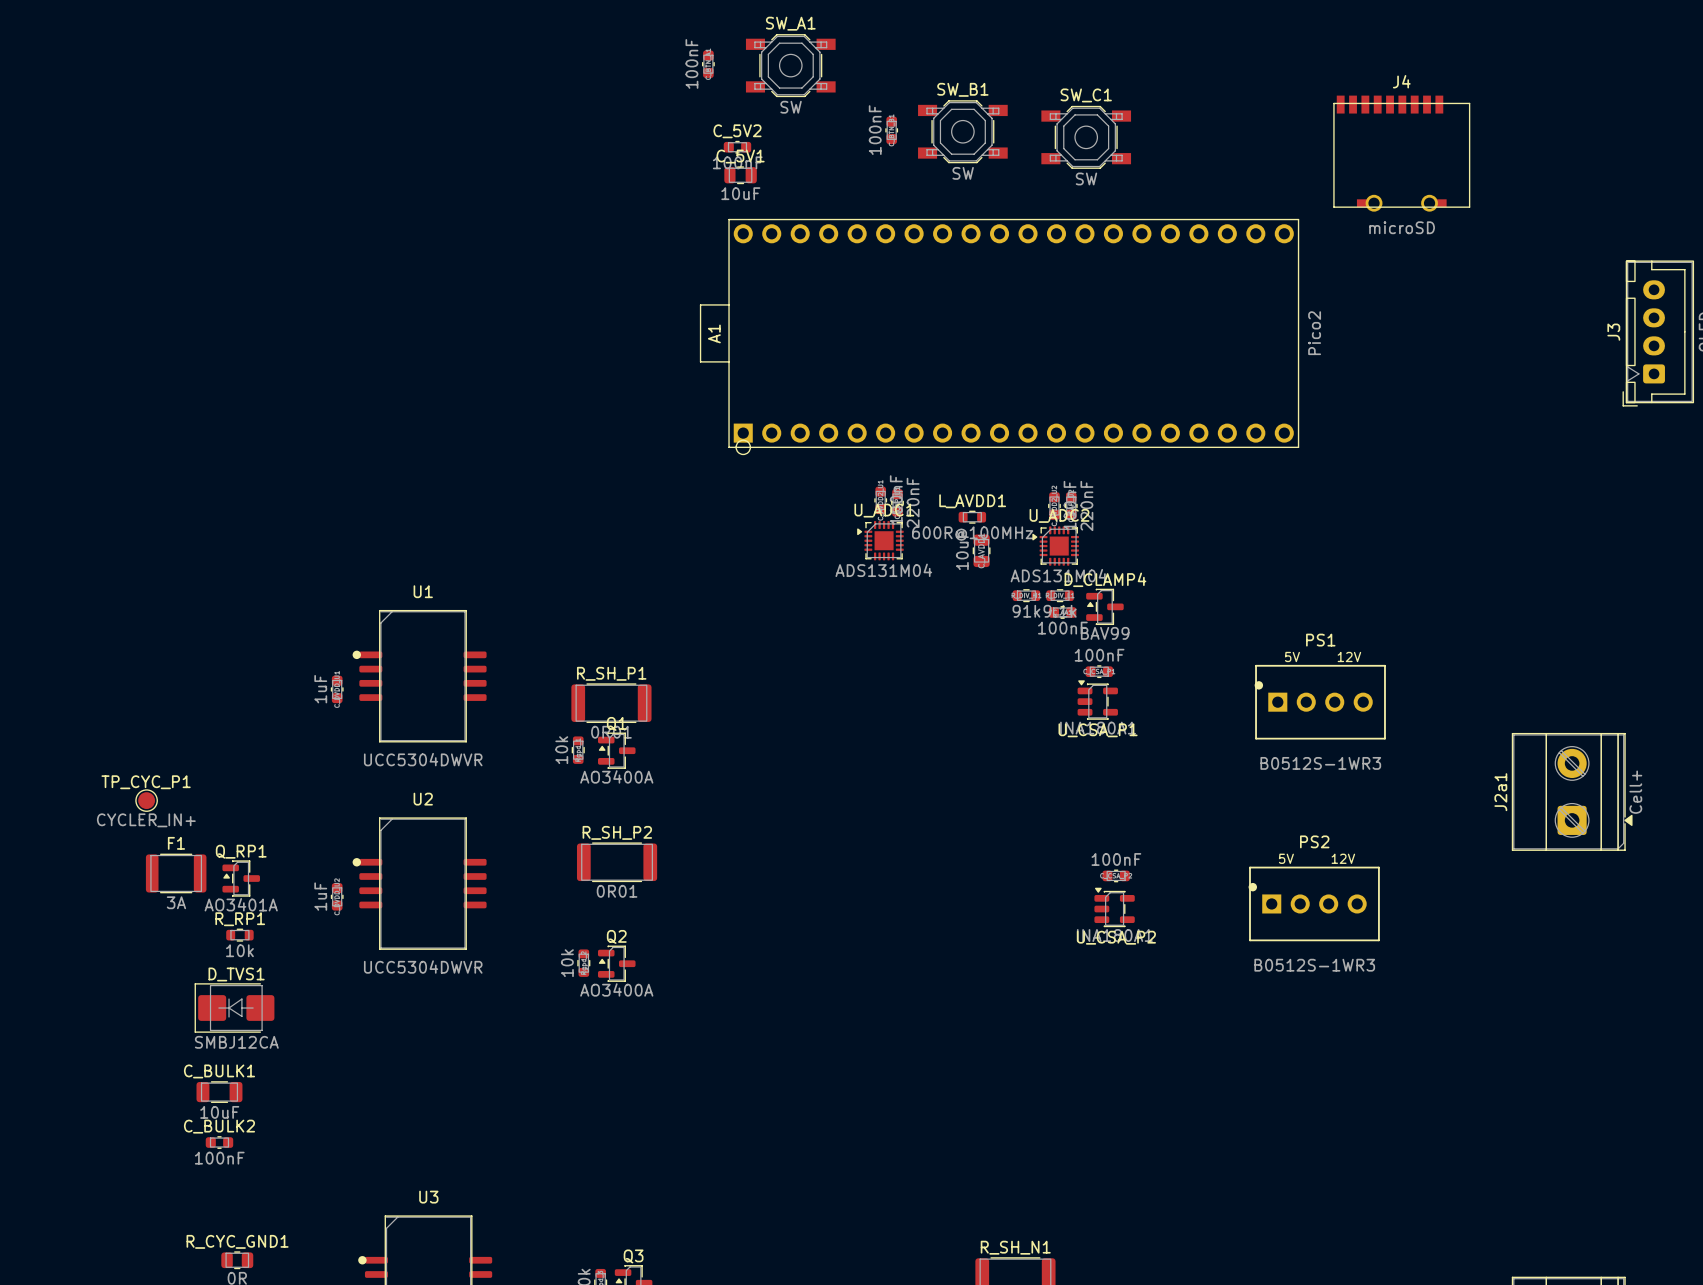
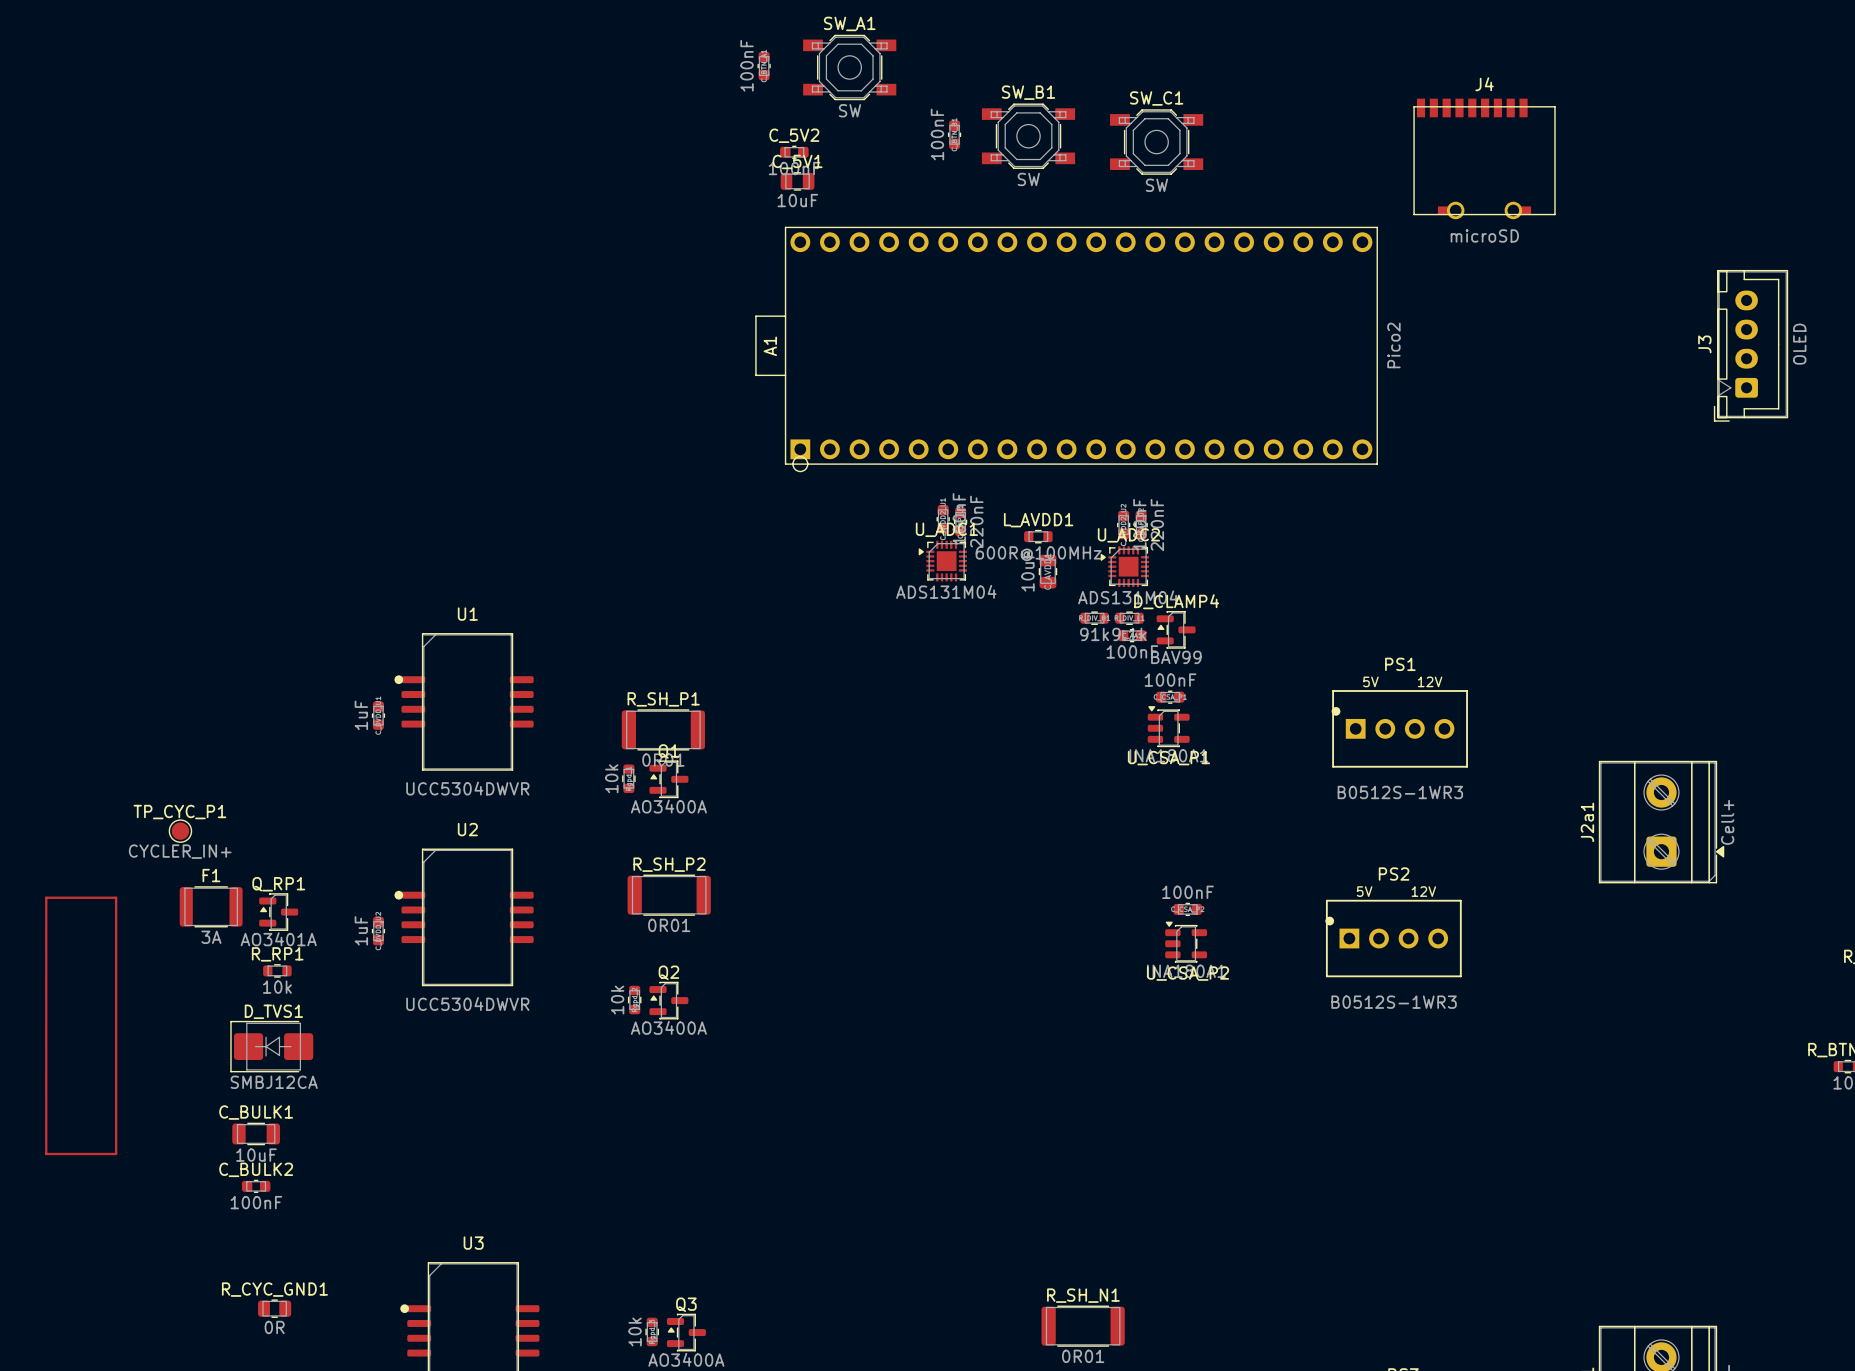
track: none -> (46, 897) (116, 897) (116, 1154) (46, 1154) (46, 897)

